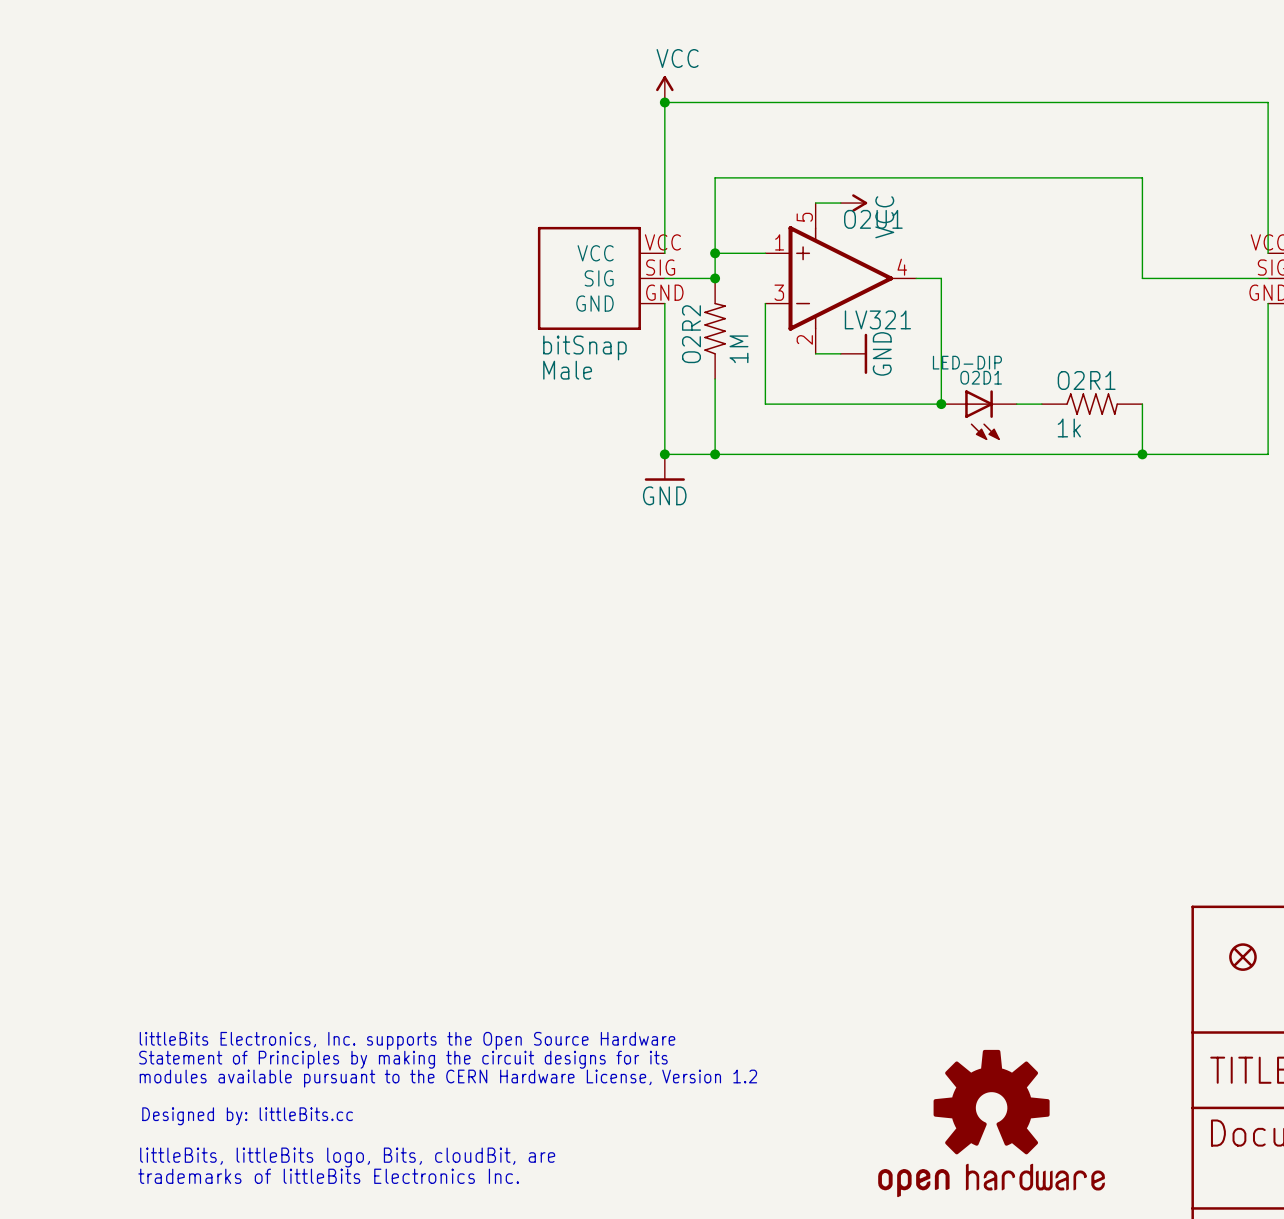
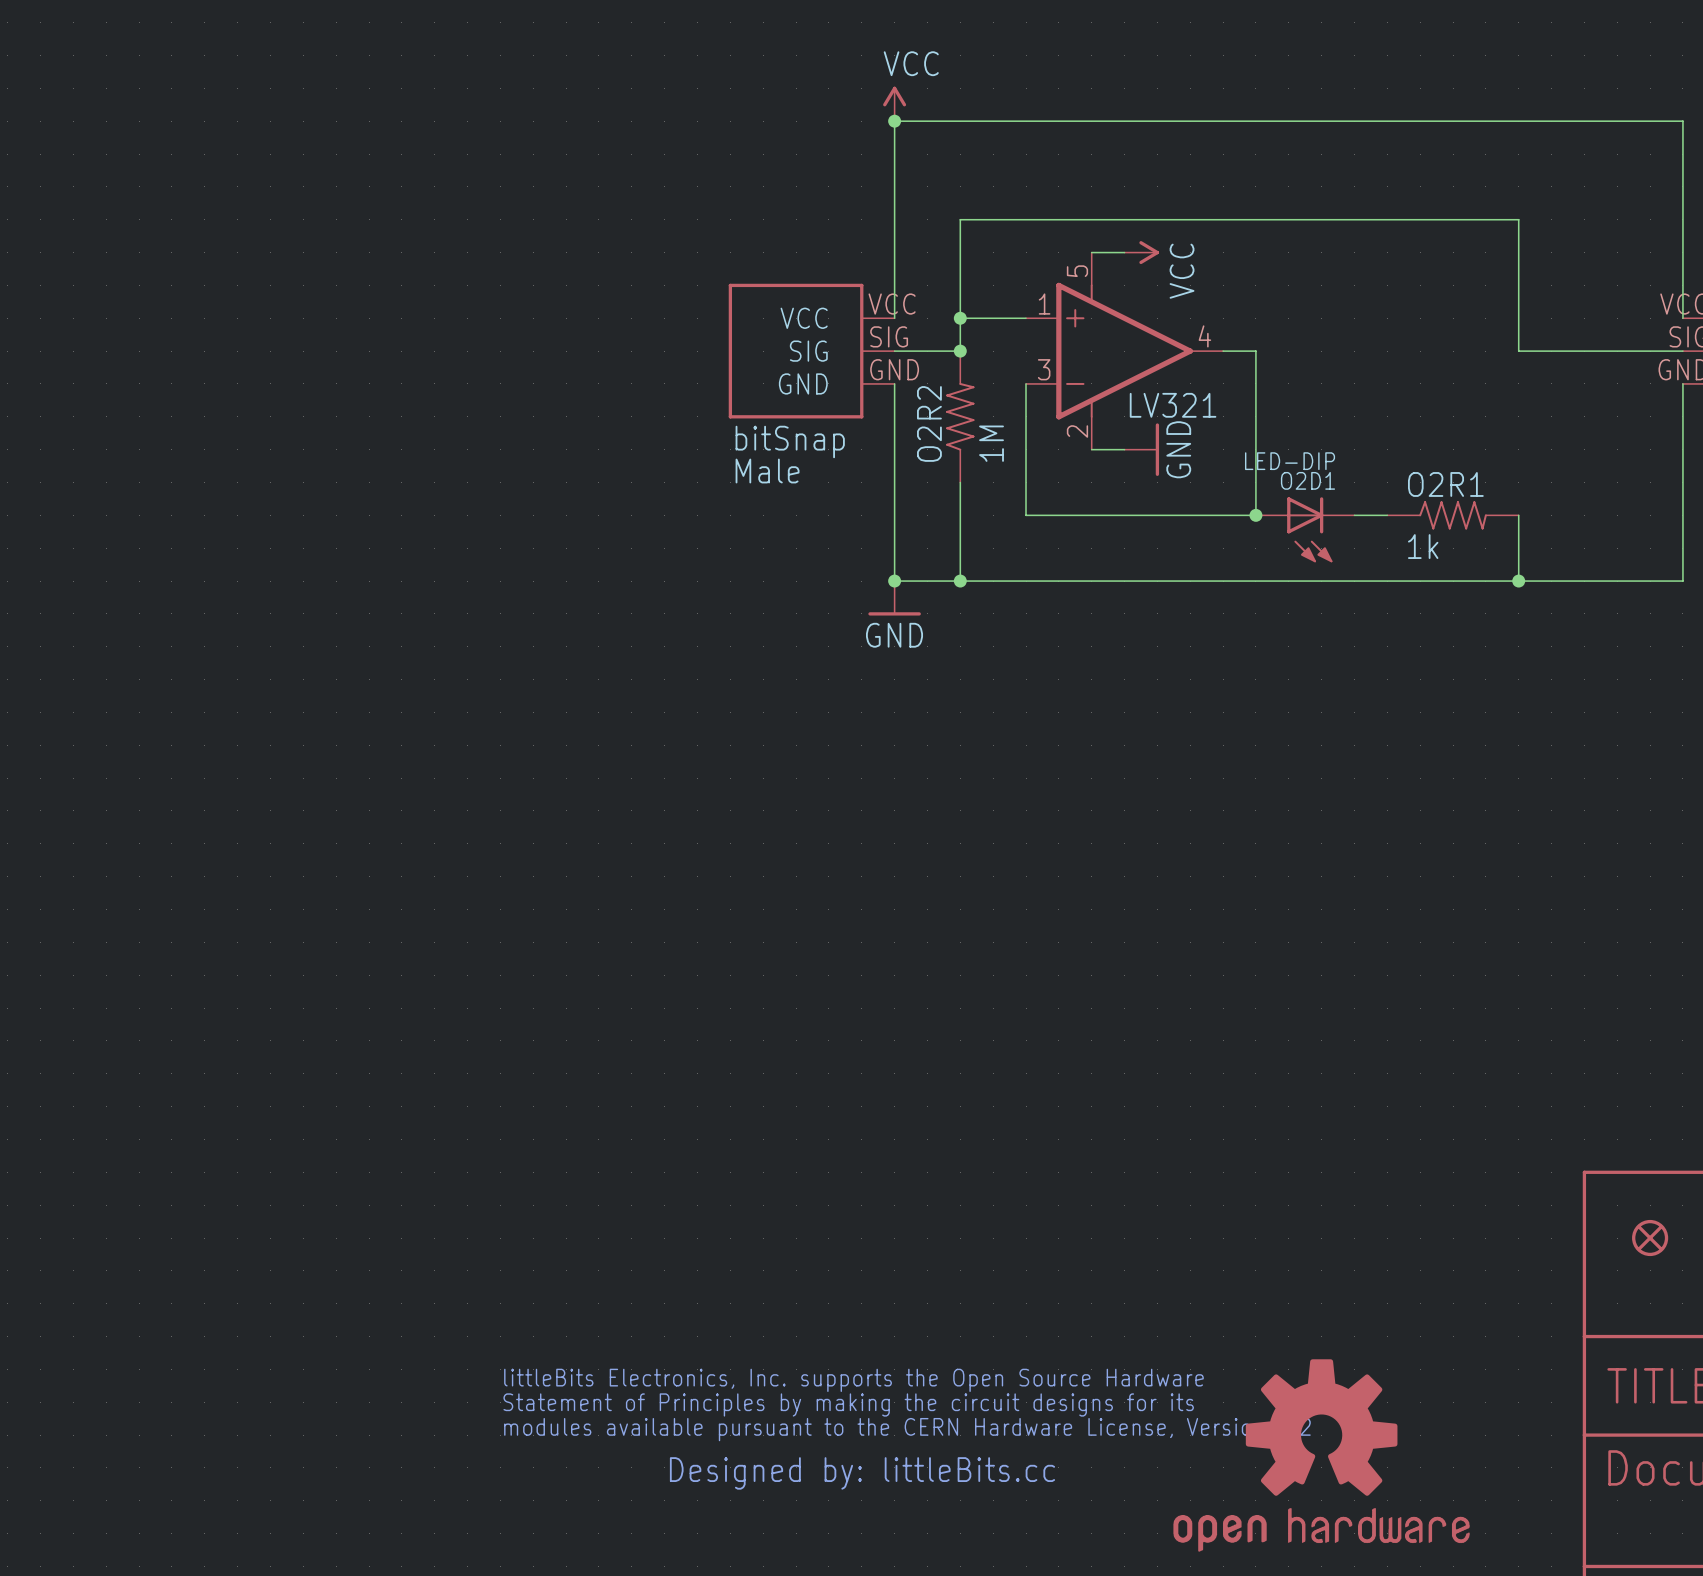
O2U1 name: O2U1 (873, 219) -> none
part: none -> (907, 1429)
part: (447, 1107) -> none

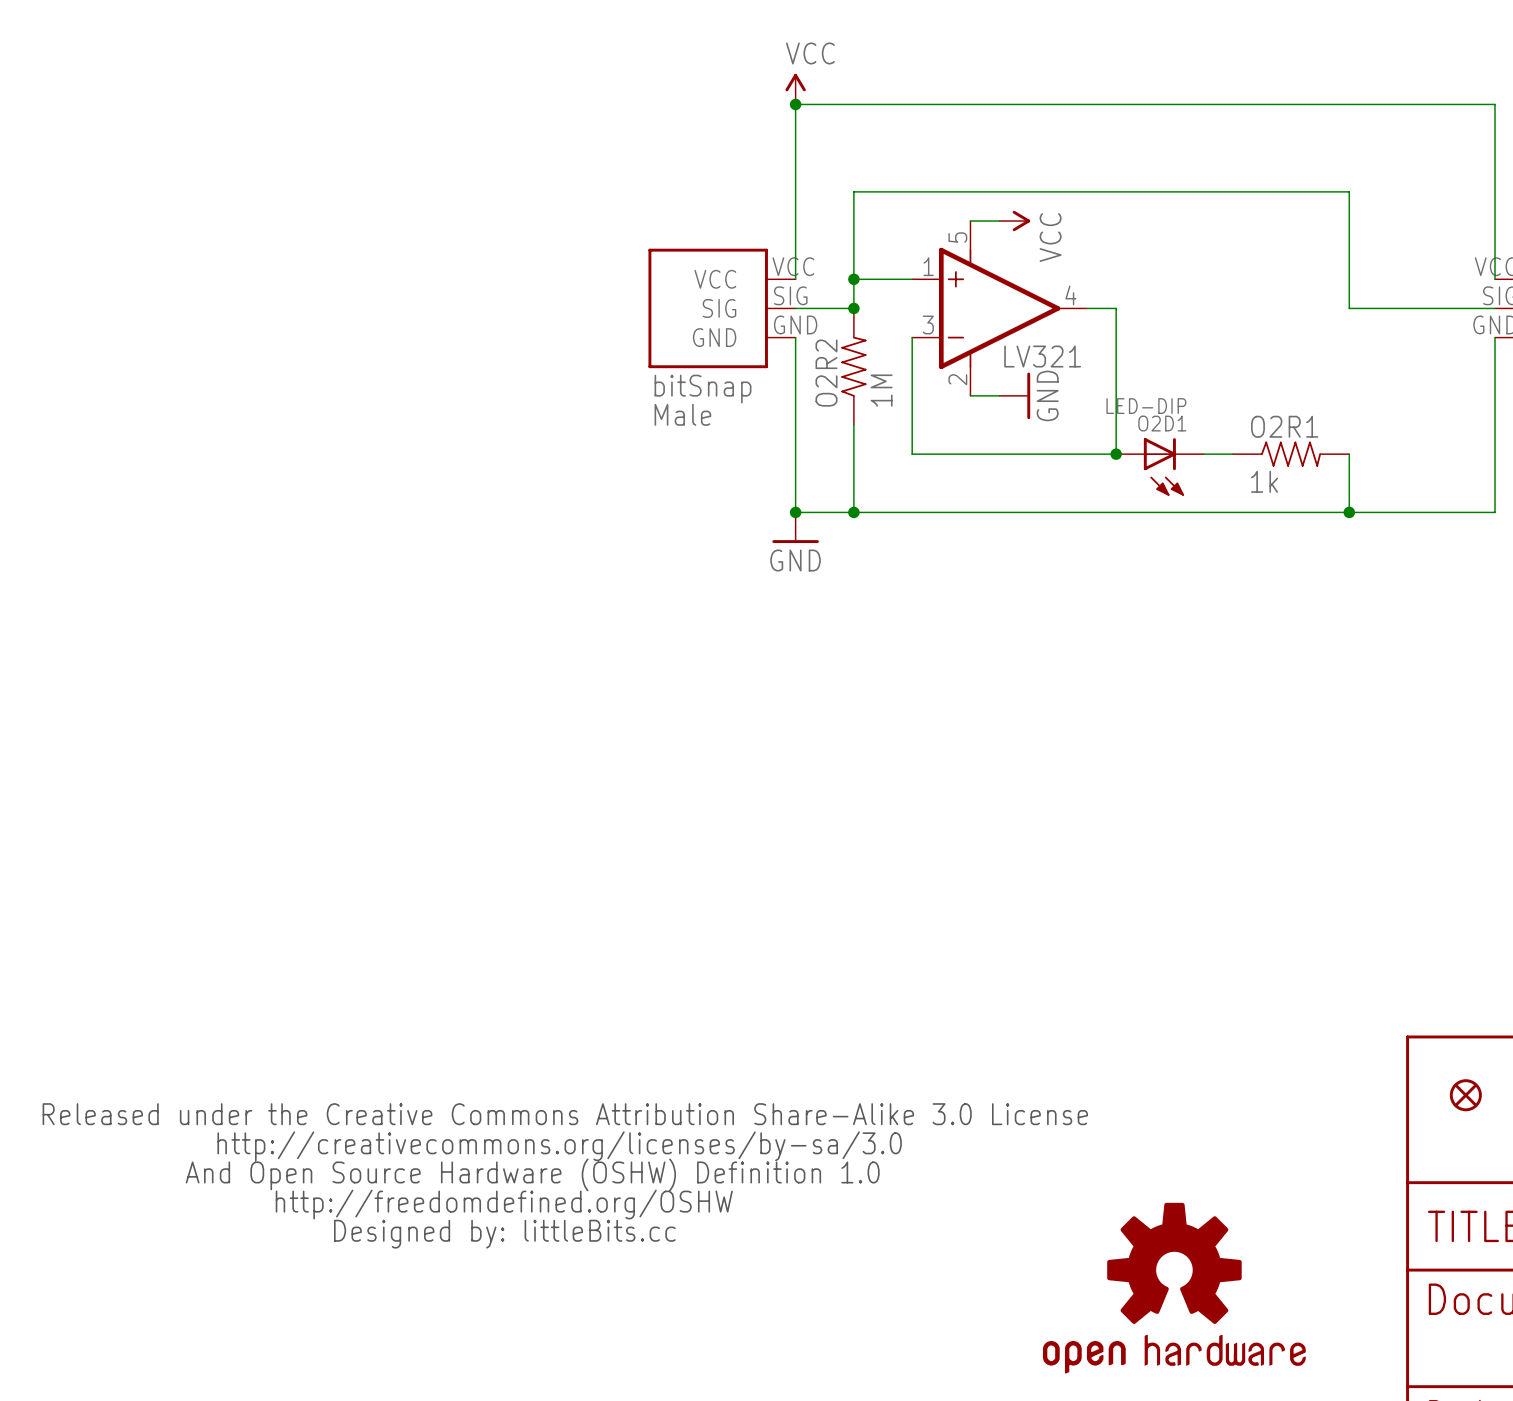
part: none -> (565, 1175)
part: (907, 1429) -> none

